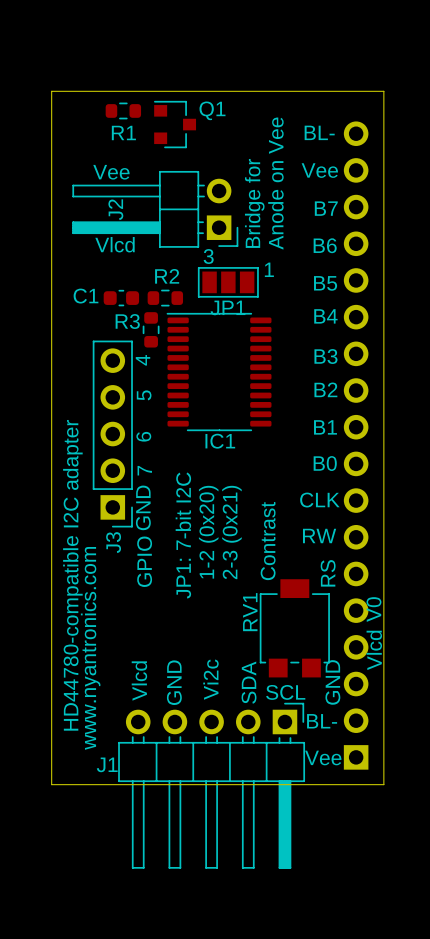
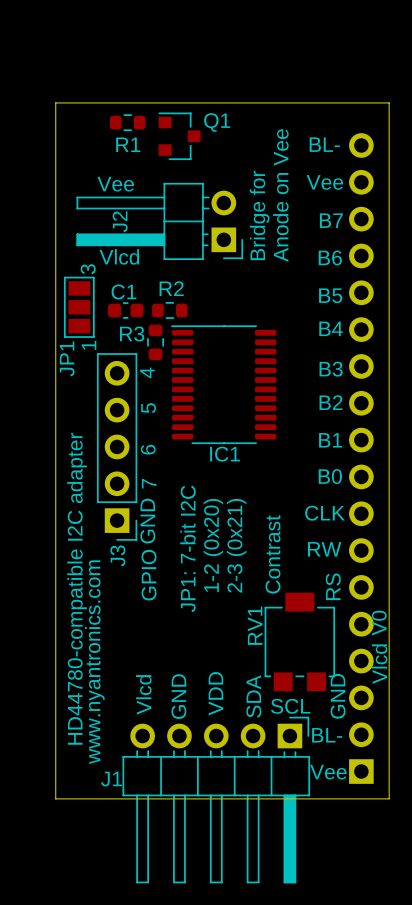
JP1 footprint: [197, 267, 259, 298] -> [63, 276, 95, 338]
C1 name position: C1 (86, 296) -> C1 (123, 291)
text: Vi2c (210, 679) -> VDD (215, 693)

